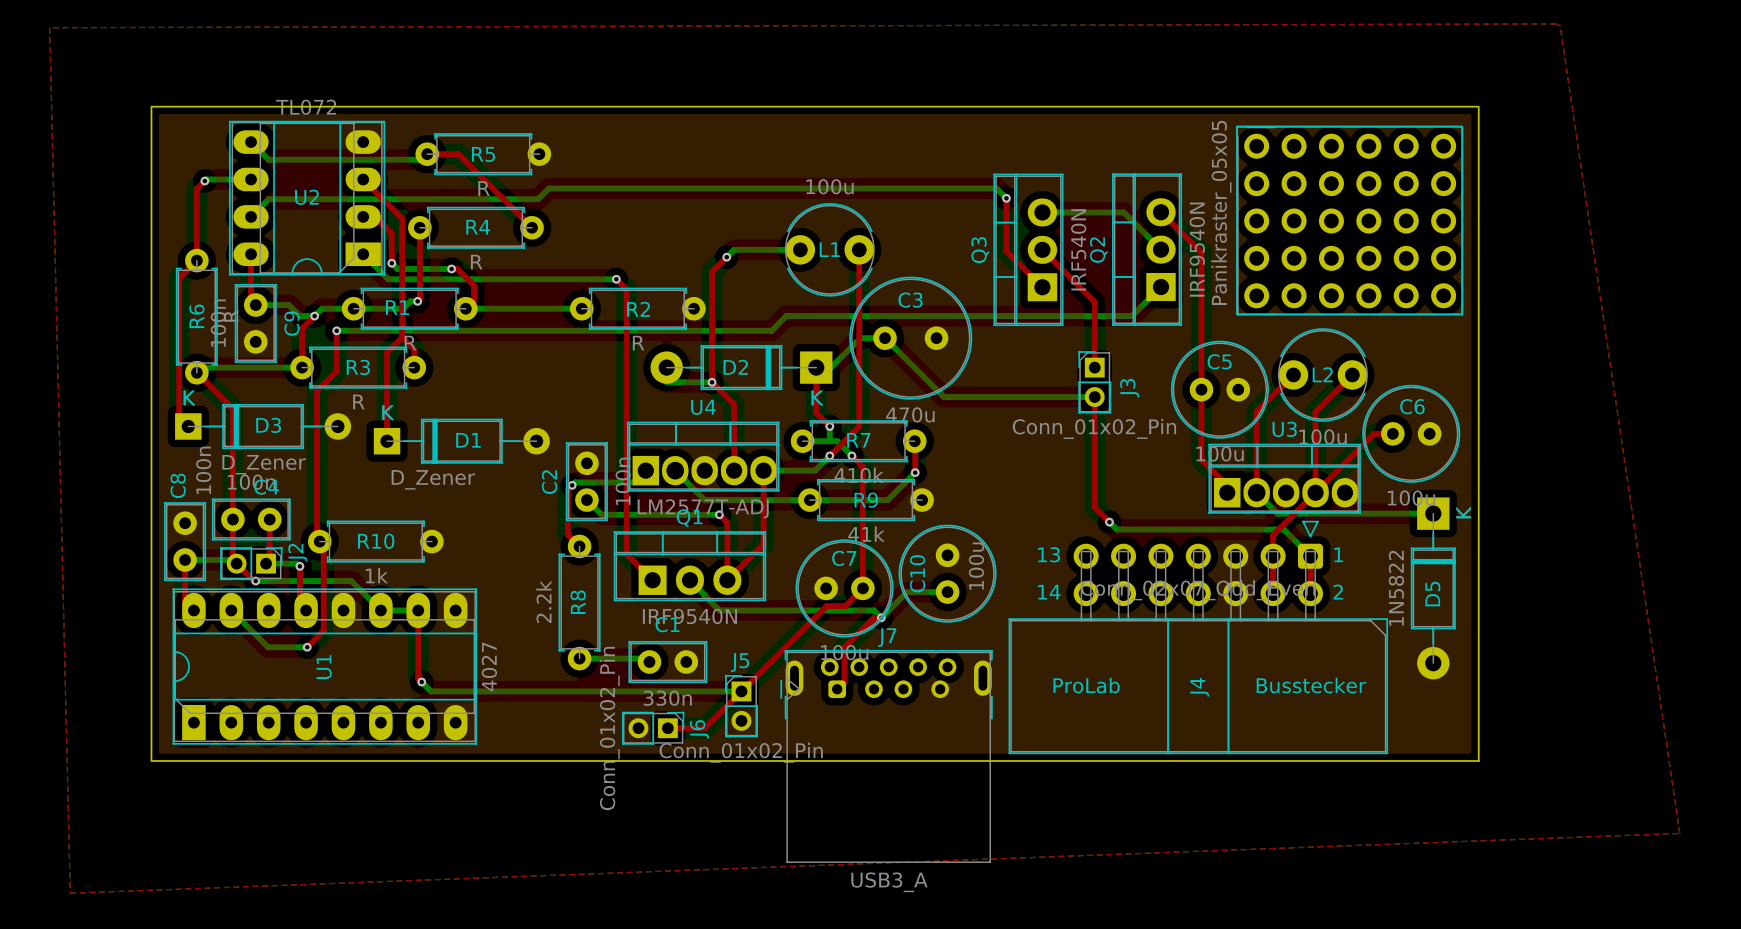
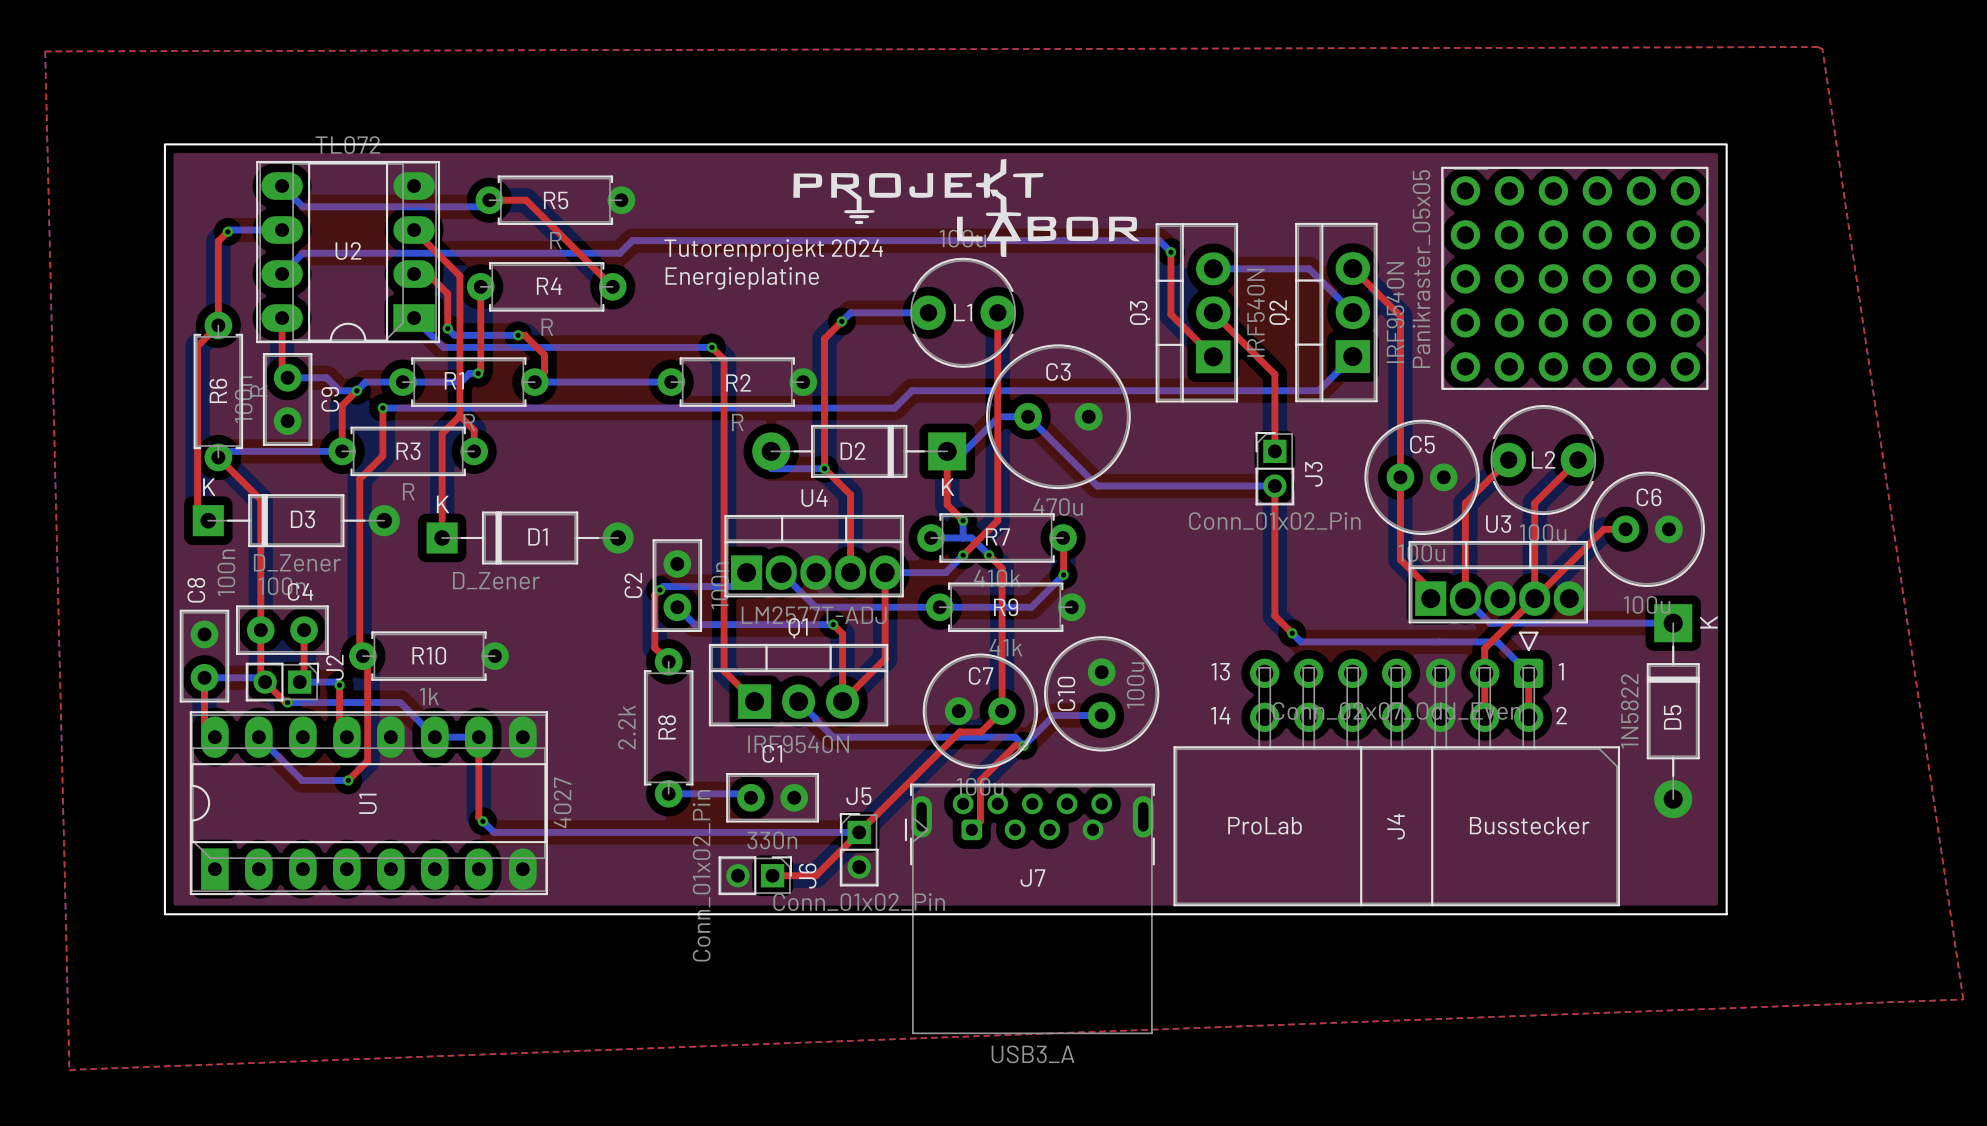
drawing: none -> [793, 159, 1140, 257]
text: none -> Tutorenprojekt 2024 (773, 250)
text: none -> Energieplatine (742, 278)
J7 name position: J7 (887, 637) -> J7 (1032, 877)

